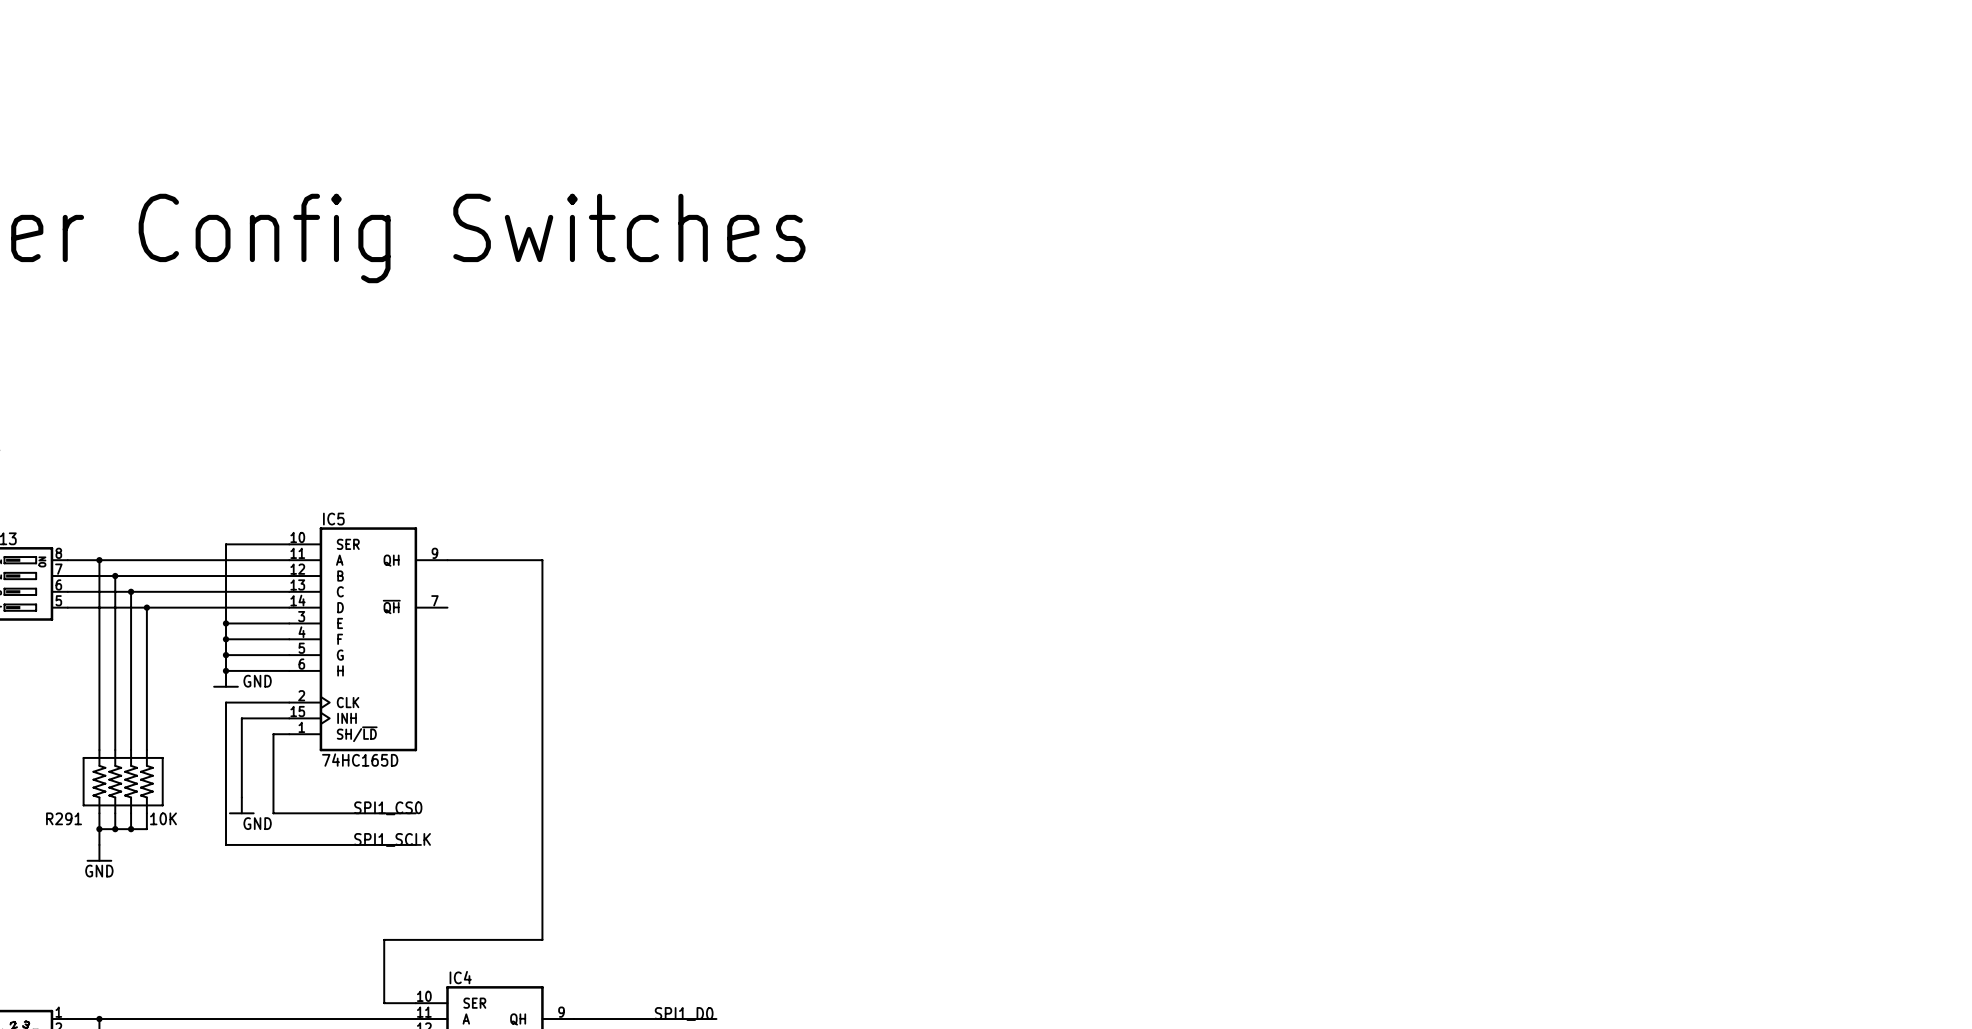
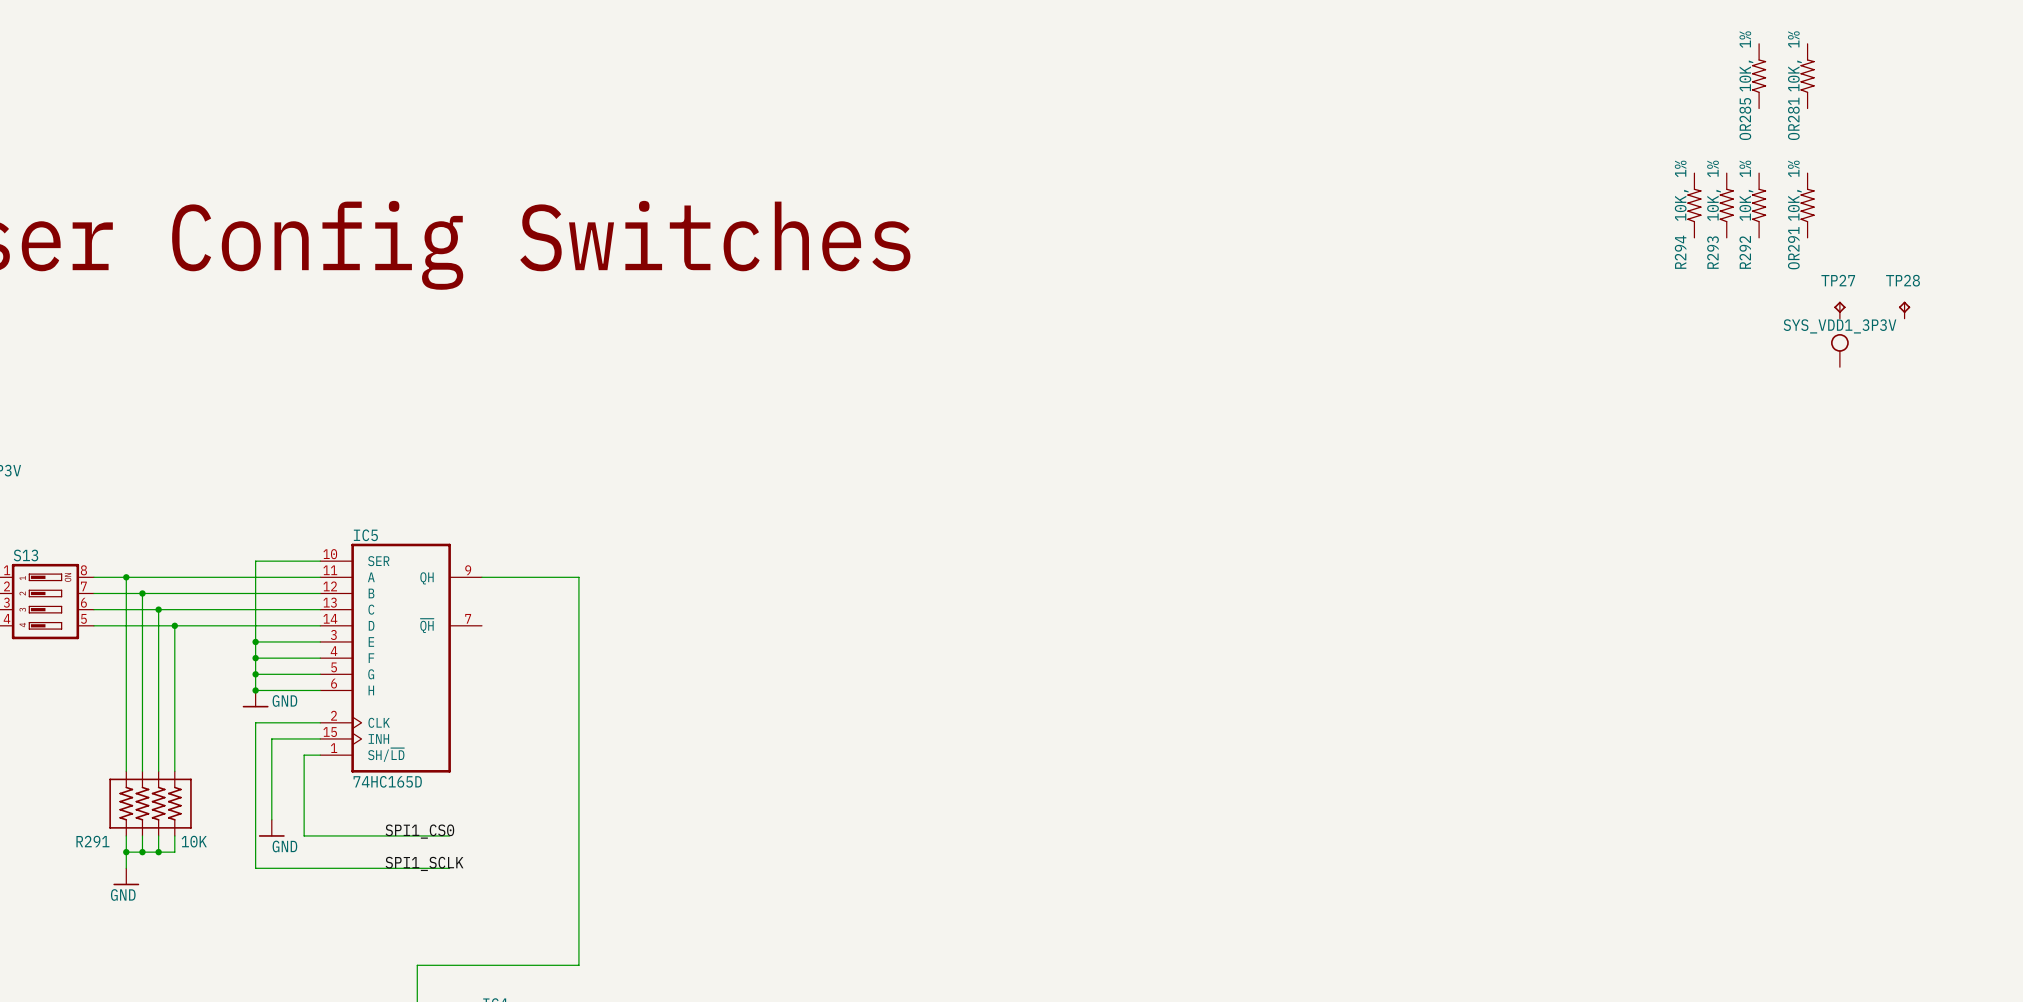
OR285: none -> 10K, 1% (1759, 76)
OR281: none -> 10K, 1% (1807, 76)
R294: none -> 10K, 1% (1694, 205)
R293: none -> 10K, 1% (1726, 205)
R292: none -> 10K, 1% (1759, 205)
OR291: none -> 10K, 1% (1807, 205)
TP27: none -> (1839, 310)
TP28: none -> (1904, 310)
power symbol: none -> SYS_VDD1_3P3V (1839, 350)

